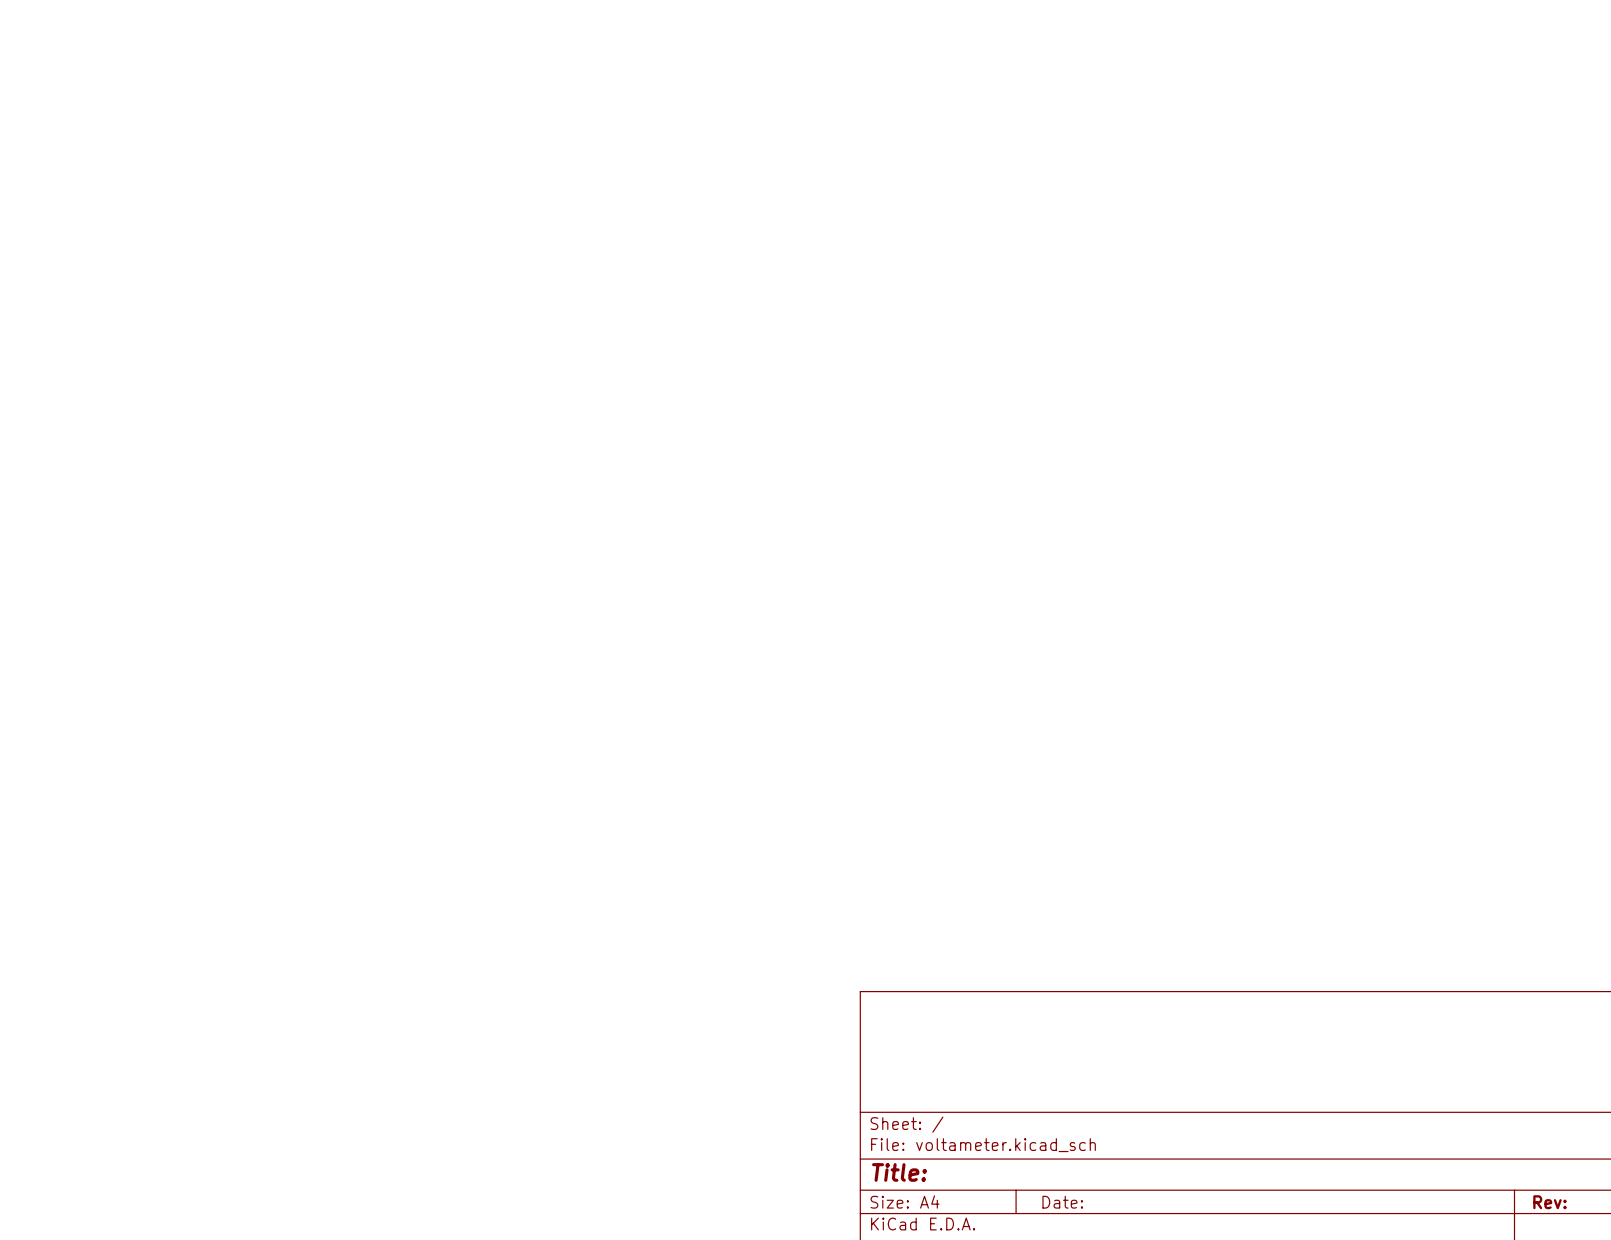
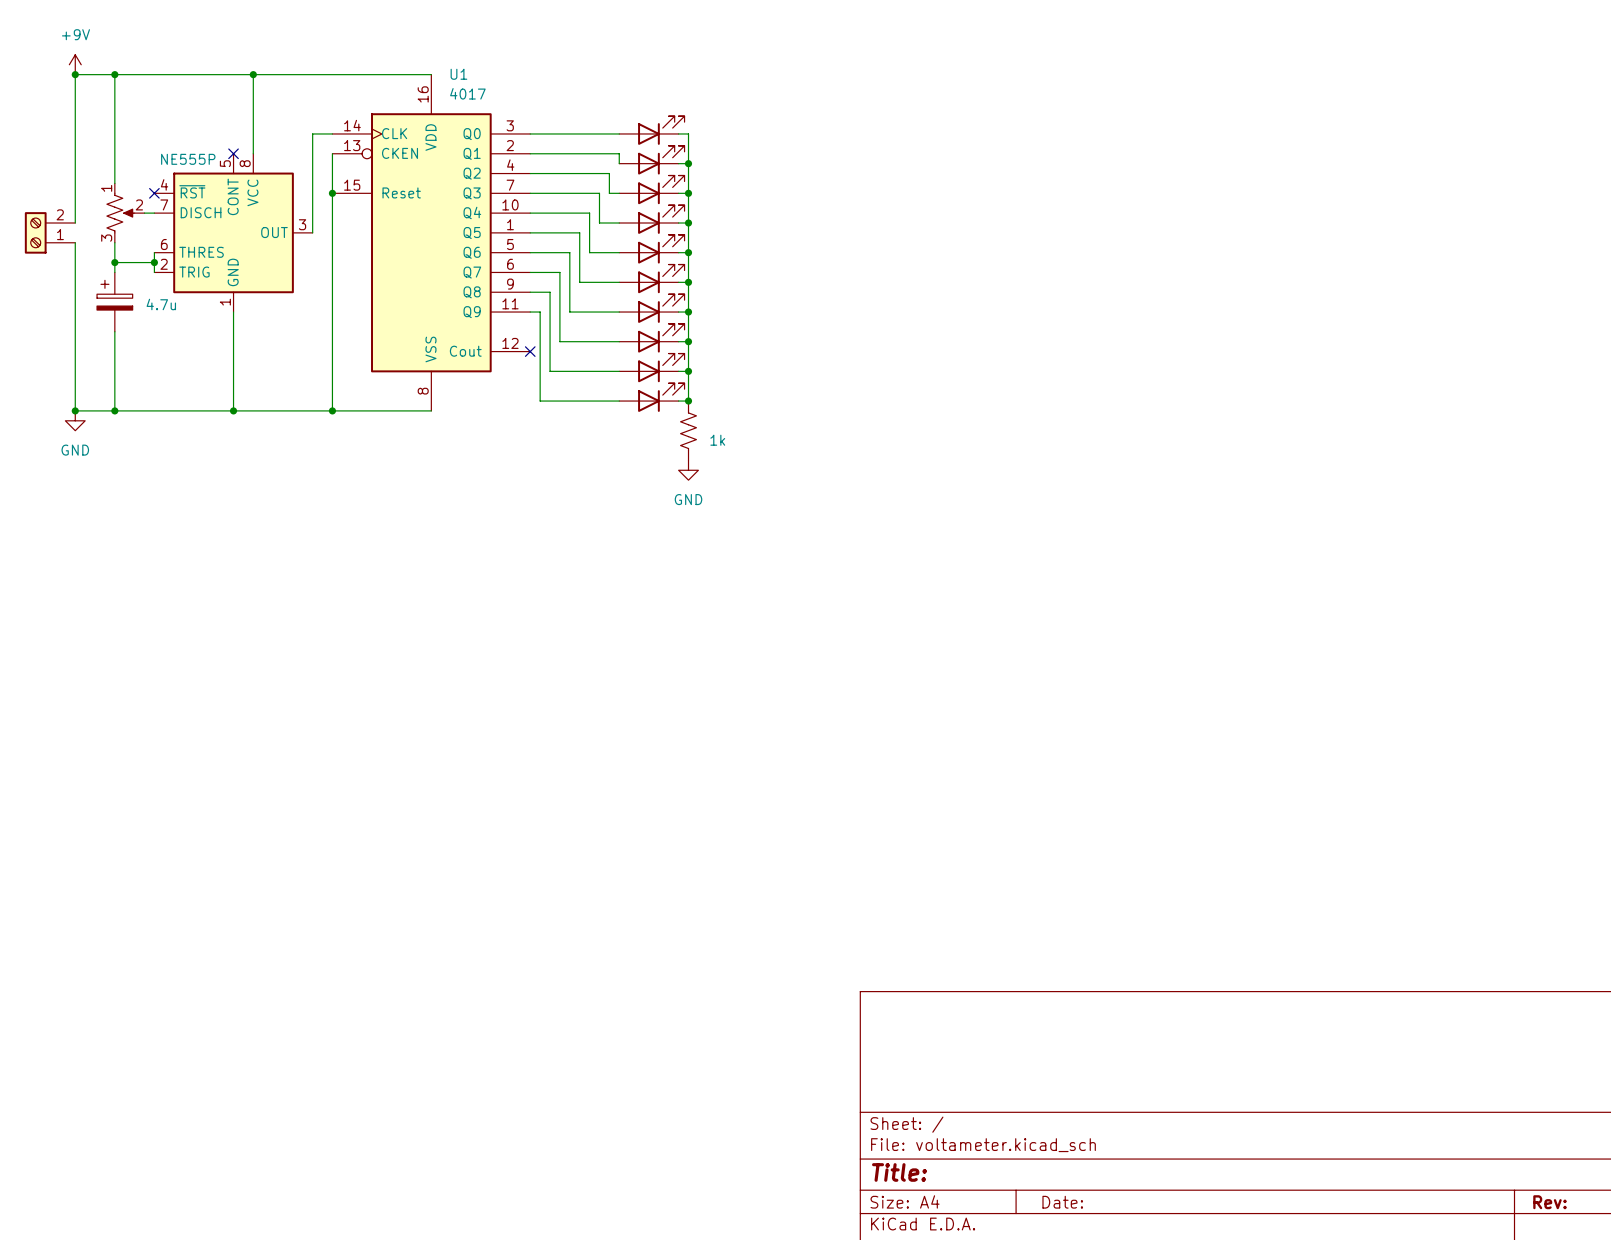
power symbol: none -> +9V (75, 64)
junction: none -> (75, 74)
wire: none -> (114, 74) (114, 183)
junction: none -> (114, 74)
wire: none -> (253, 74) (253, 153)
junction: none -> (253, 74)
wire: none -> (431, 74) (75, 74) (75, 223)
part: none -> (651, 130)
wire: none -> (332, 133) (312, 133) (312, 232)
wire: none -> (530, 133) (619, 133)
wire: none -> (678, 133) (688, 133) (688, 401) (678, 401)
no-connect mark: none -> (233, 153)
wire: none -> (332, 153) (332, 410)
wire: none -> (530, 153) (619, 153) (619, 163)
part: none -> (651, 160)
wire: none -> (678, 163) (688, 163)
junction: none -> (688, 163)
wire: none -> (530, 173) (609, 173) (609, 193) (619, 193)
part: none -> (651, 189)
no-connect mark: none -> (154, 193)
junction: none -> (332, 193)
wire: none -> (530, 193) (599, 193) (599, 223) (619, 223)
wire: none -> (678, 193) (688, 193)
junction: none -> (688, 193)
part: none -> (125, 213)
wire: none -> (144, 213) (154, 213)
wire: none -> (530, 213) (589, 213) (589, 252) (619, 252)
part: none -> (651, 219)
wire: none -> (678, 223) (688, 223)
junction: none -> (688, 223)
part: none -> (50, 232)
part: none -> NE555P (233, 232)
wire: none -> (530, 232) (579, 232) (579, 282) (619, 282)
wire: none -> (75, 242) (75, 410) (431, 410)
wire: none -> (114, 242) (114, 272)
U1: none -> 4017 (431, 242)
part: none -> (651, 249)
wire: none -> (154, 252) (154, 272)
wire: none -> (530, 252) (569, 252) (569, 312) (619, 312)
wire: none -> (678, 252) (688, 252)
junction: none -> (688, 252)
wire: none -> (114, 262) (154, 262)
junction: none -> (114, 262)
junction: none -> (154, 262)
wire: none -> (530, 272) (559, 272) (559, 341) (619, 341)
part: none -> (651, 278)
wire: none -> (678, 282) (688, 282)
junction: none -> (688, 282)
wire: none -> (530, 292) (550, 292) (550, 371) (619, 371)
part: none -> 4.7u (114, 302)
part: none -> (651, 308)
wire: none -> (233, 312) (233, 410)
wire: none -> (530, 312) (540, 312) (540, 401) (619, 401)
wire: none -> (678, 312) (688, 312)
junction: none -> (688, 312)
wire: none -> (114, 331) (114, 410)
part: none -> (651, 338)
wire: none -> (678, 341) (688, 341)
junction: none -> (688, 341)
no-connect mark: none -> (530, 351)
part: none -> (651, 367)
wire: none -> (678, 371) (688, 371)
junction: none -> (688, 371)
part: none -> (651, 397)
junction: none -> (688, 401)
junction: none -> (75, 410)
junction: none -> (114, 410)
junction: none -> (233, 410)
junction: none -> (332, 410)
power symbol: none -> GND (75, 420)
part: none -> 1k (688, 430)
power symbol: none -> GND (688, 470)

